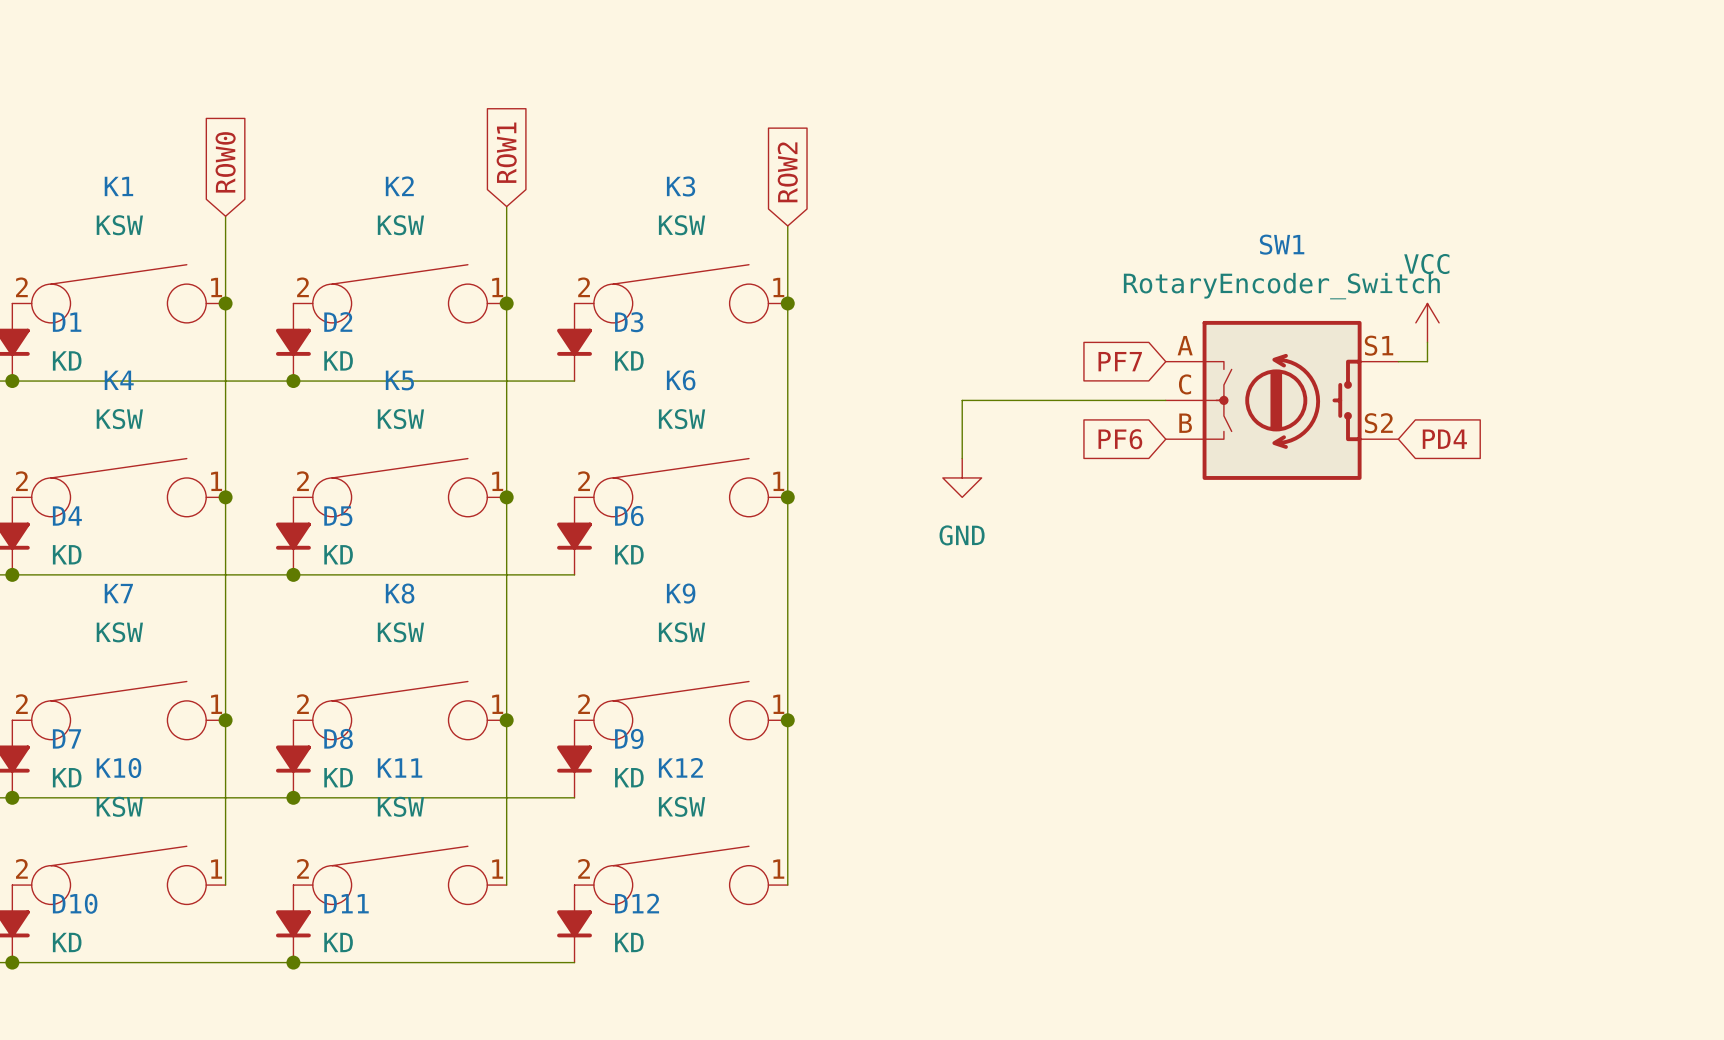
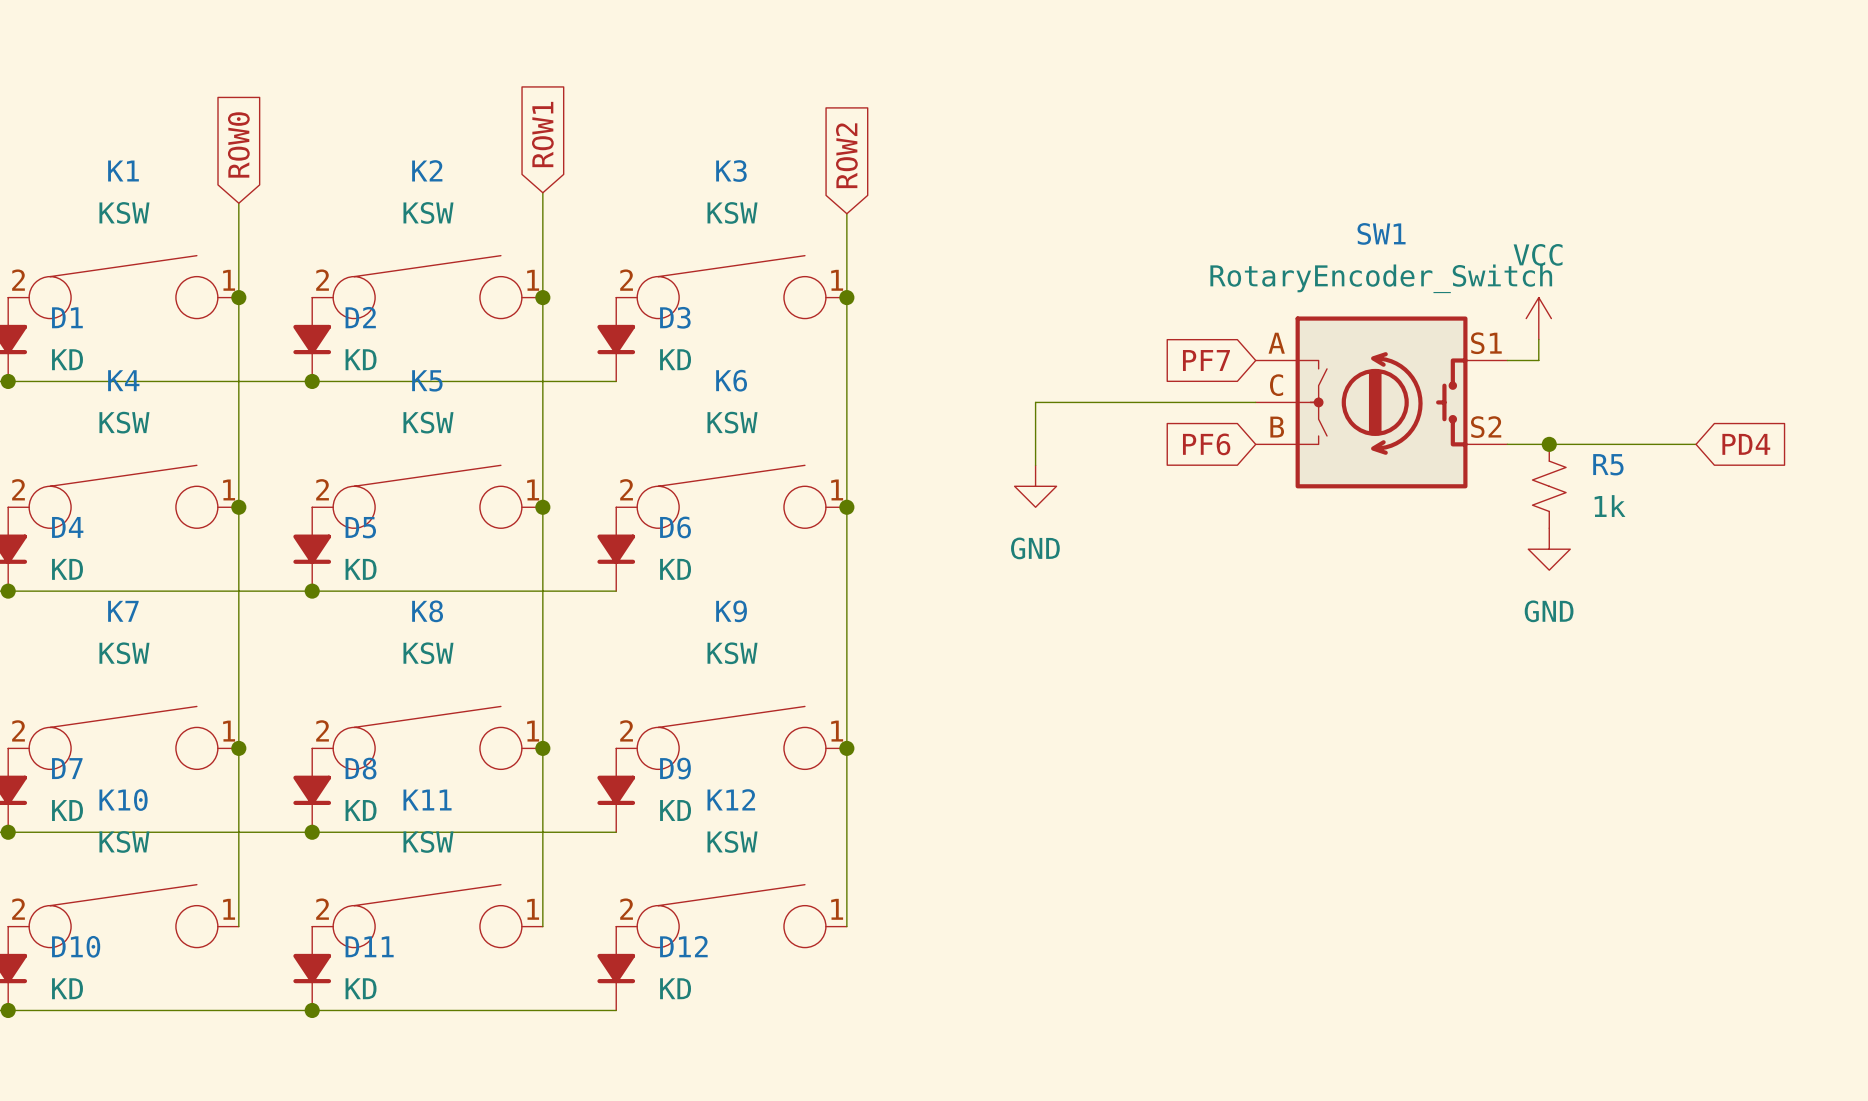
wire: none -> (1507, 444) (1696, 444)
junction: none -> (1549, 444)
global label position: PD4 (1444, 439) -> PD4 (1746, 444)
R5: none -> 1k (1549, 486)
power symbol: none -> GND (1549, 549)

